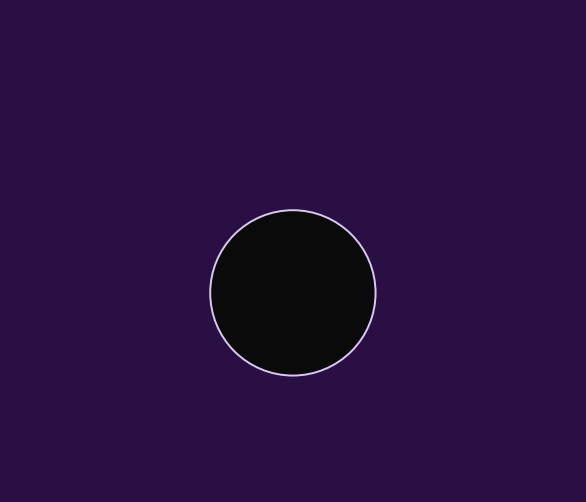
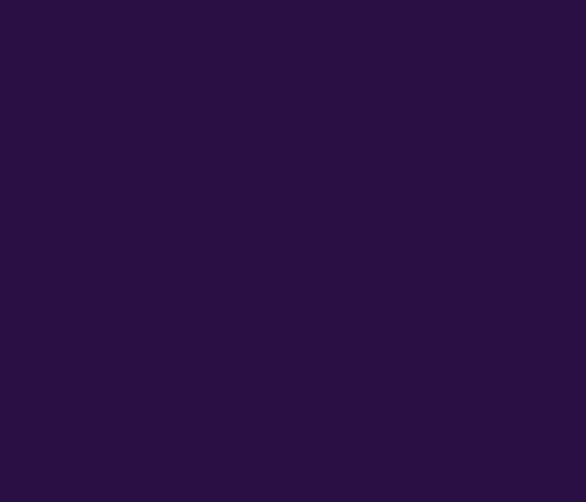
part: (292, 292) -> none

